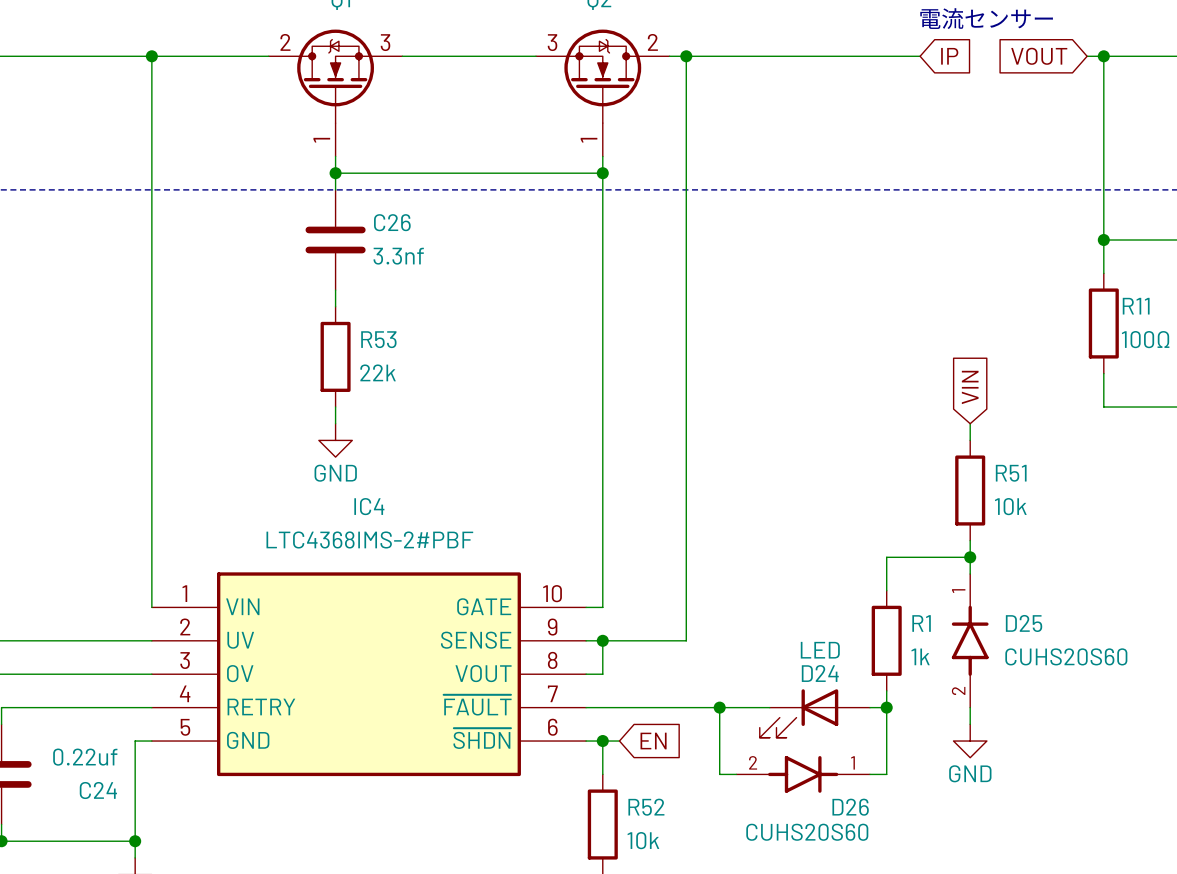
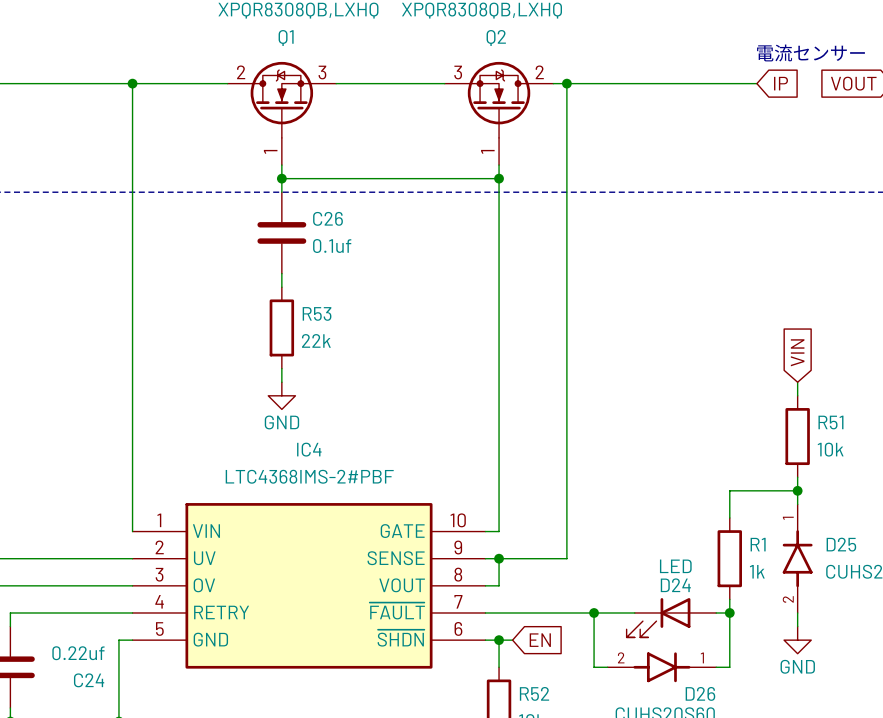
C26 value: 3.3nf (398, 256) -> 0.1uf (332, 246)

